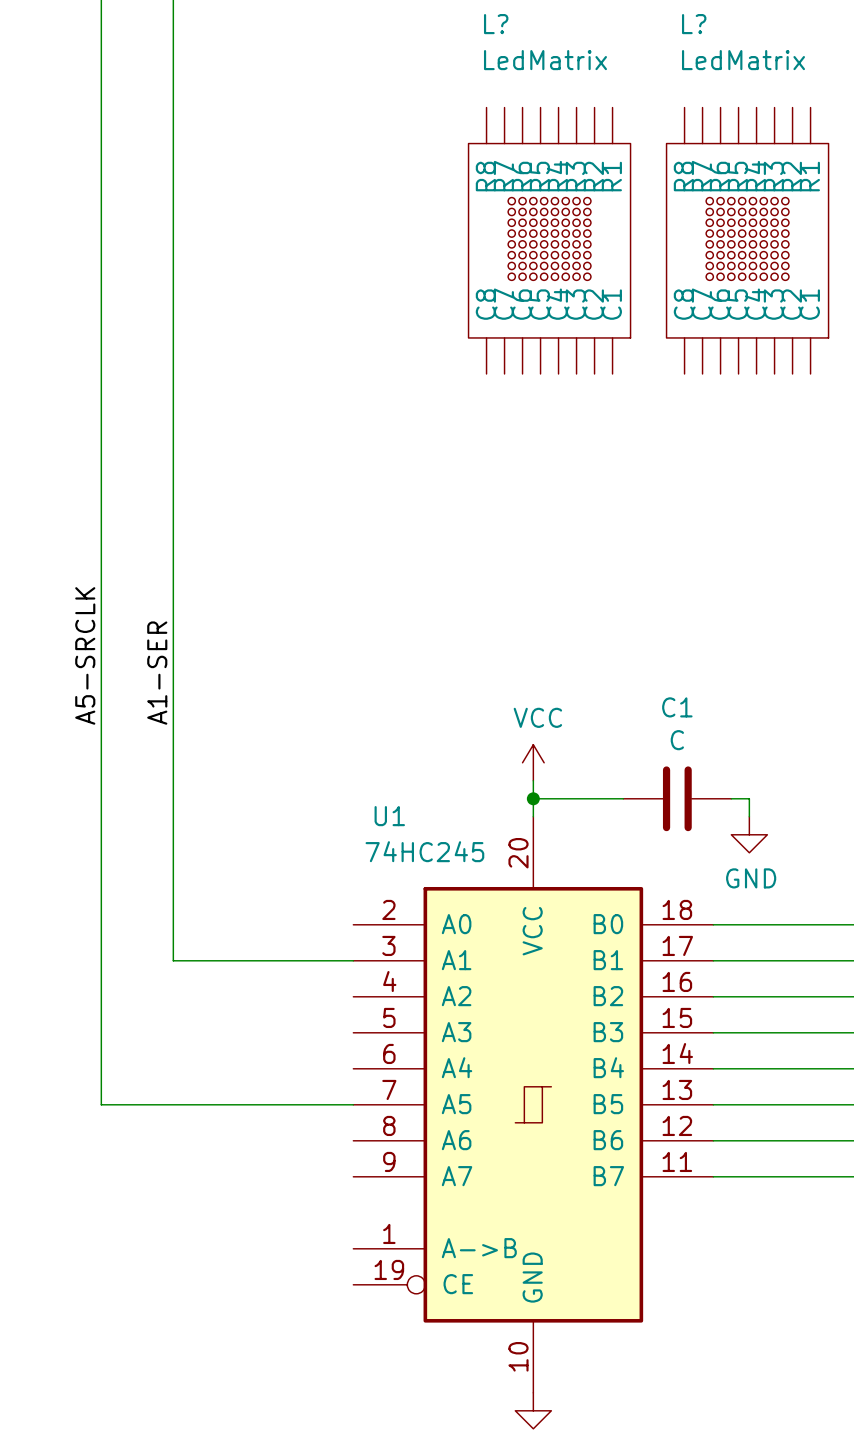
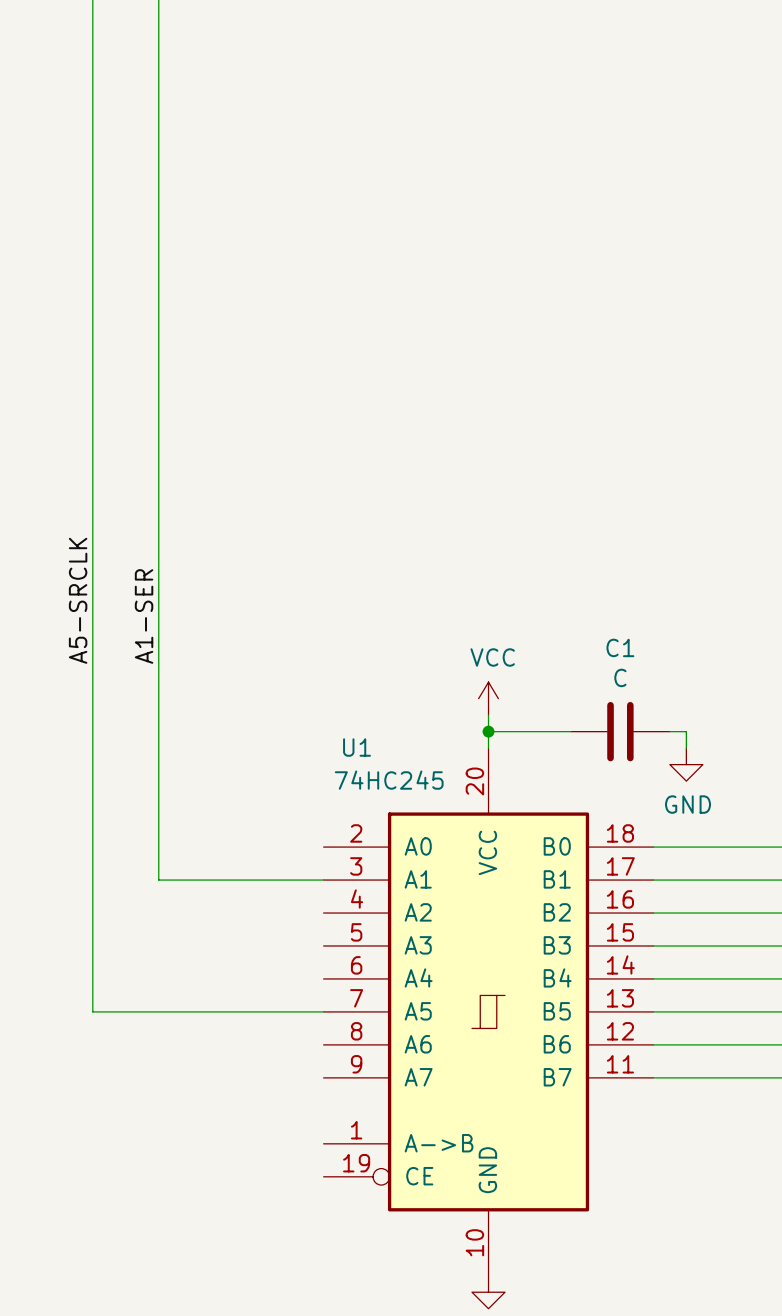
L?: LedMatrix (549, 240) -> none
L?: LedMatrix (747, 240) -> none

